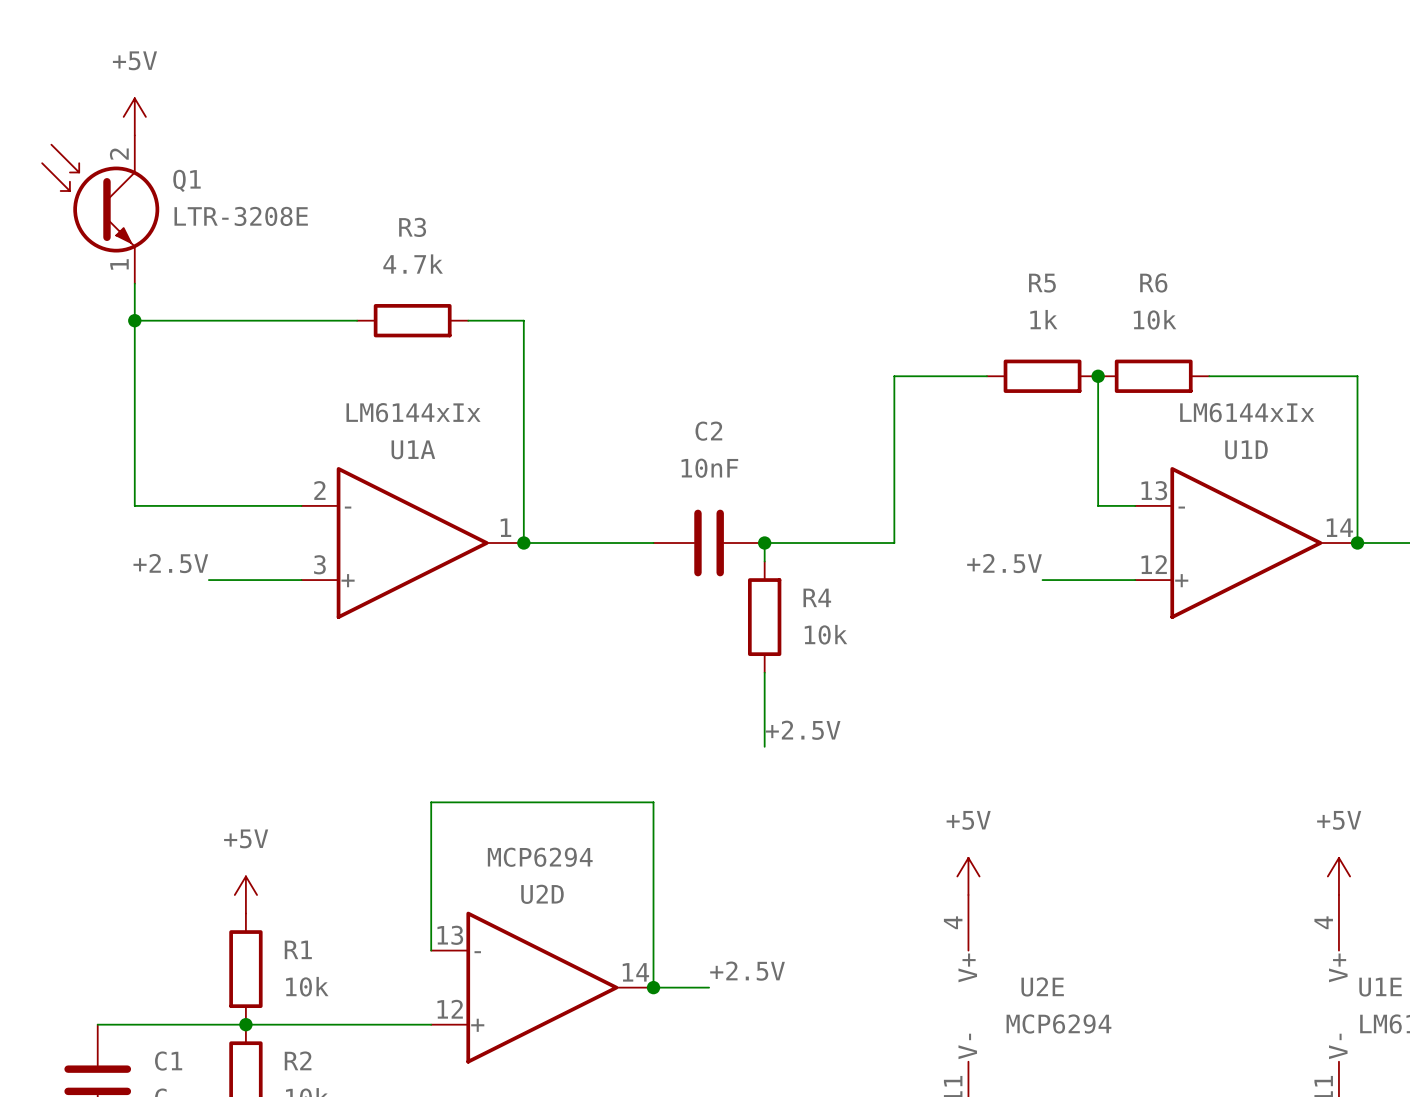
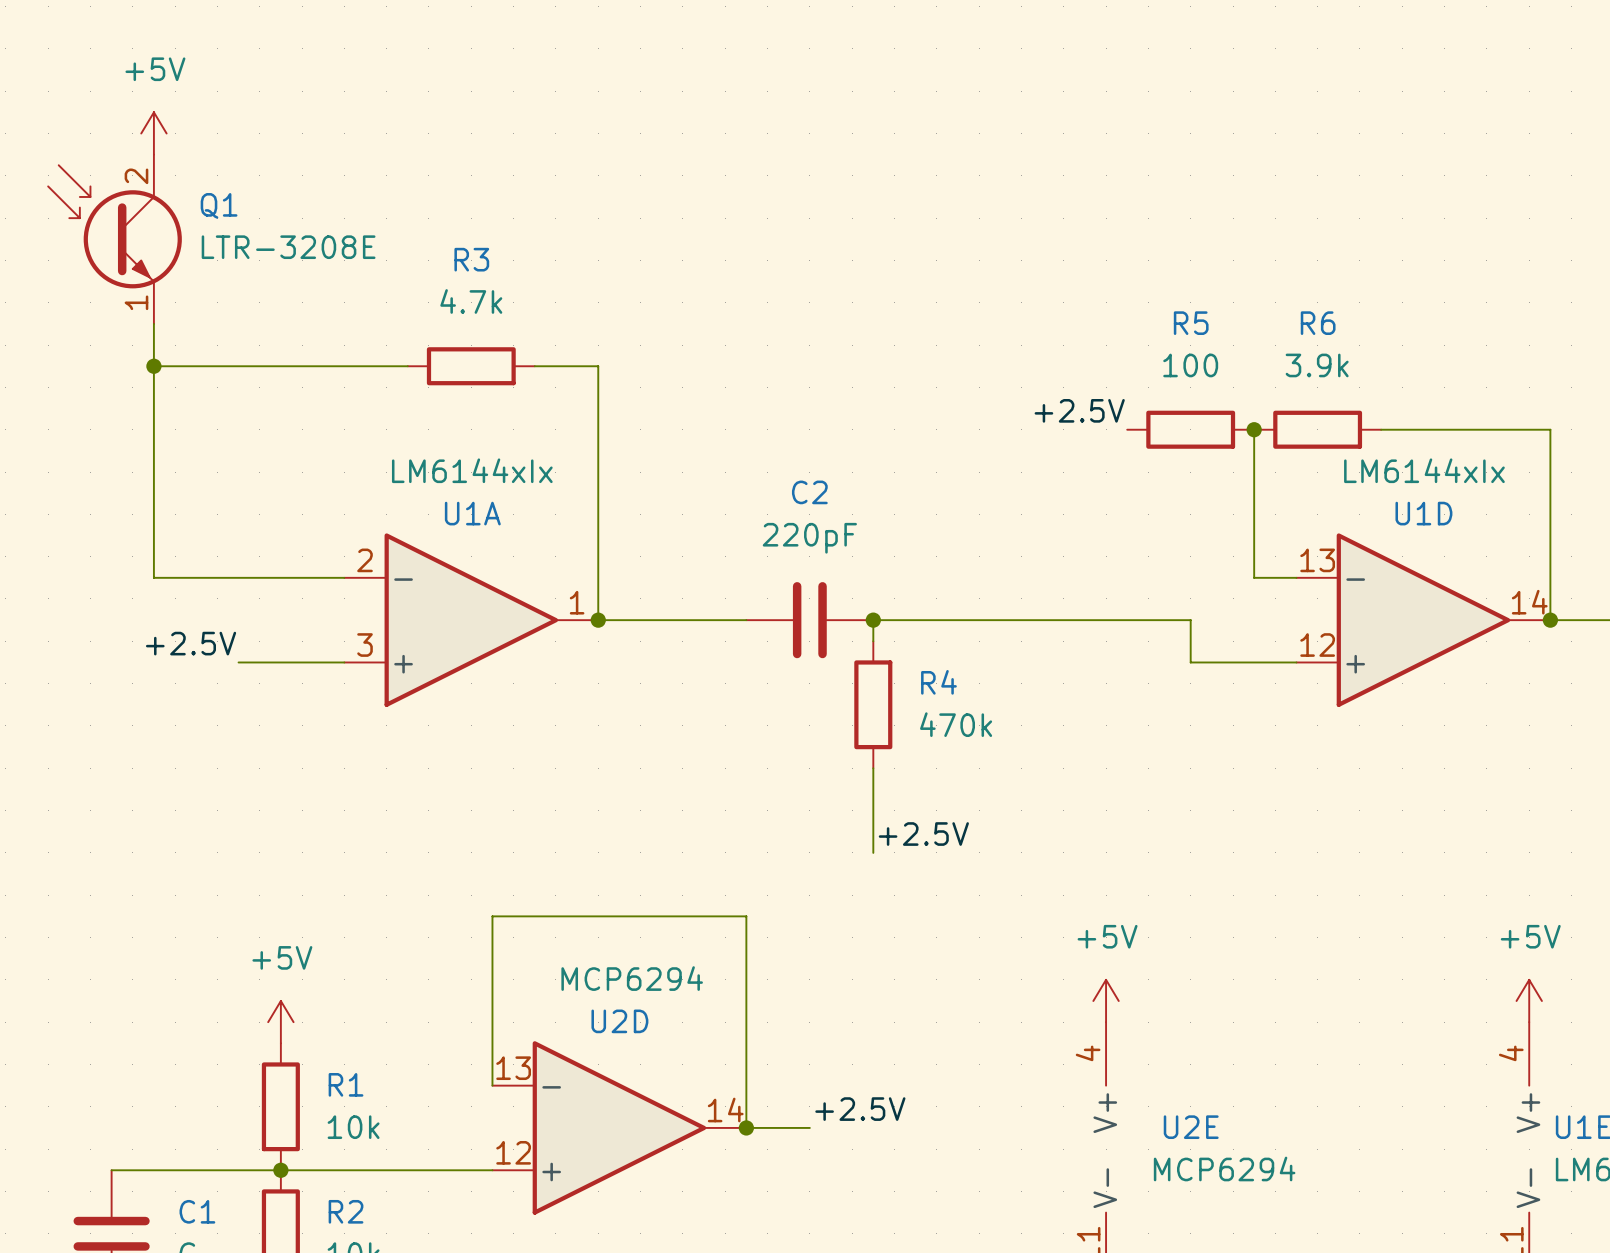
R5 value: 1k (1043, 319) -> 100 (1190, 365)
R6 value: 10k (1155, 319) -> 3.9k (1317, 365)
wire: (986, 376) (894, 376) (894, 543) -> (1190, 662) (1190, 620) (1021, 620)
C2 value: 10nF (709, 468) -> 220pF (809, 538)
label position: +2.5V (1004, 563) -> +2.5V (1079, 410)
R4 value: 10k (826, 634) -> 470k (956, 724)

